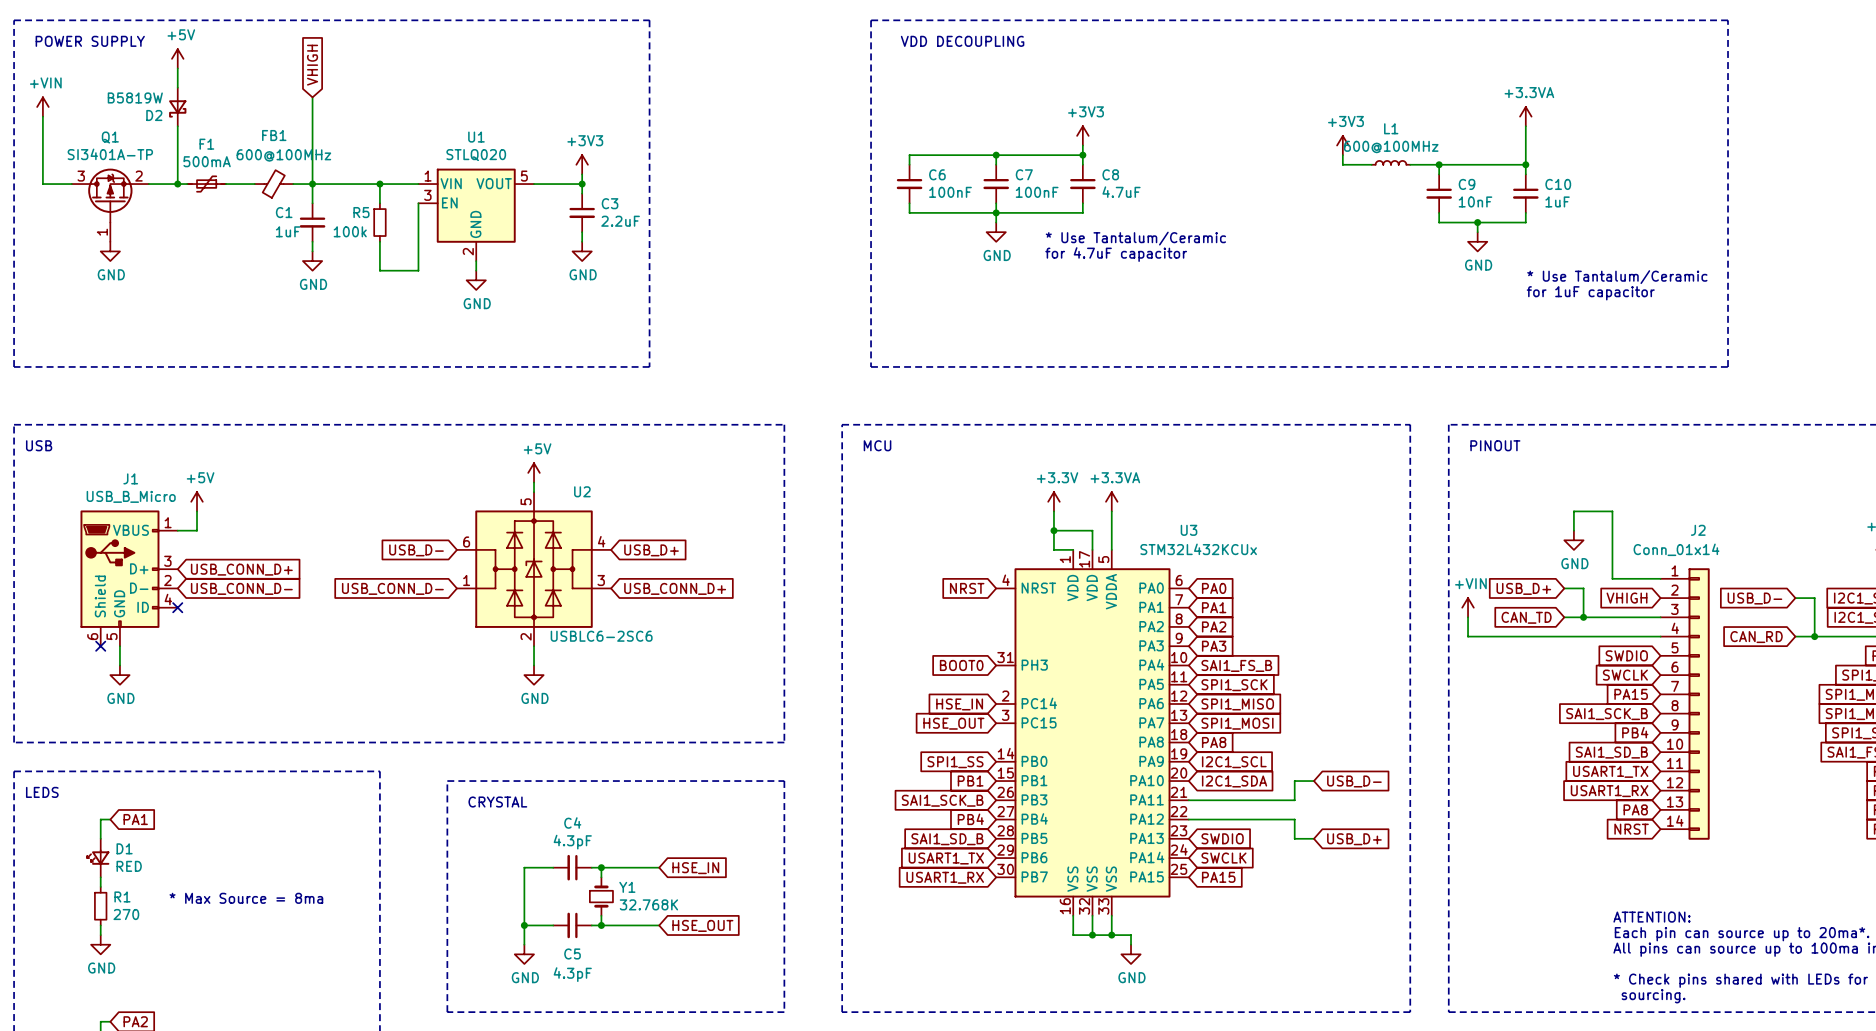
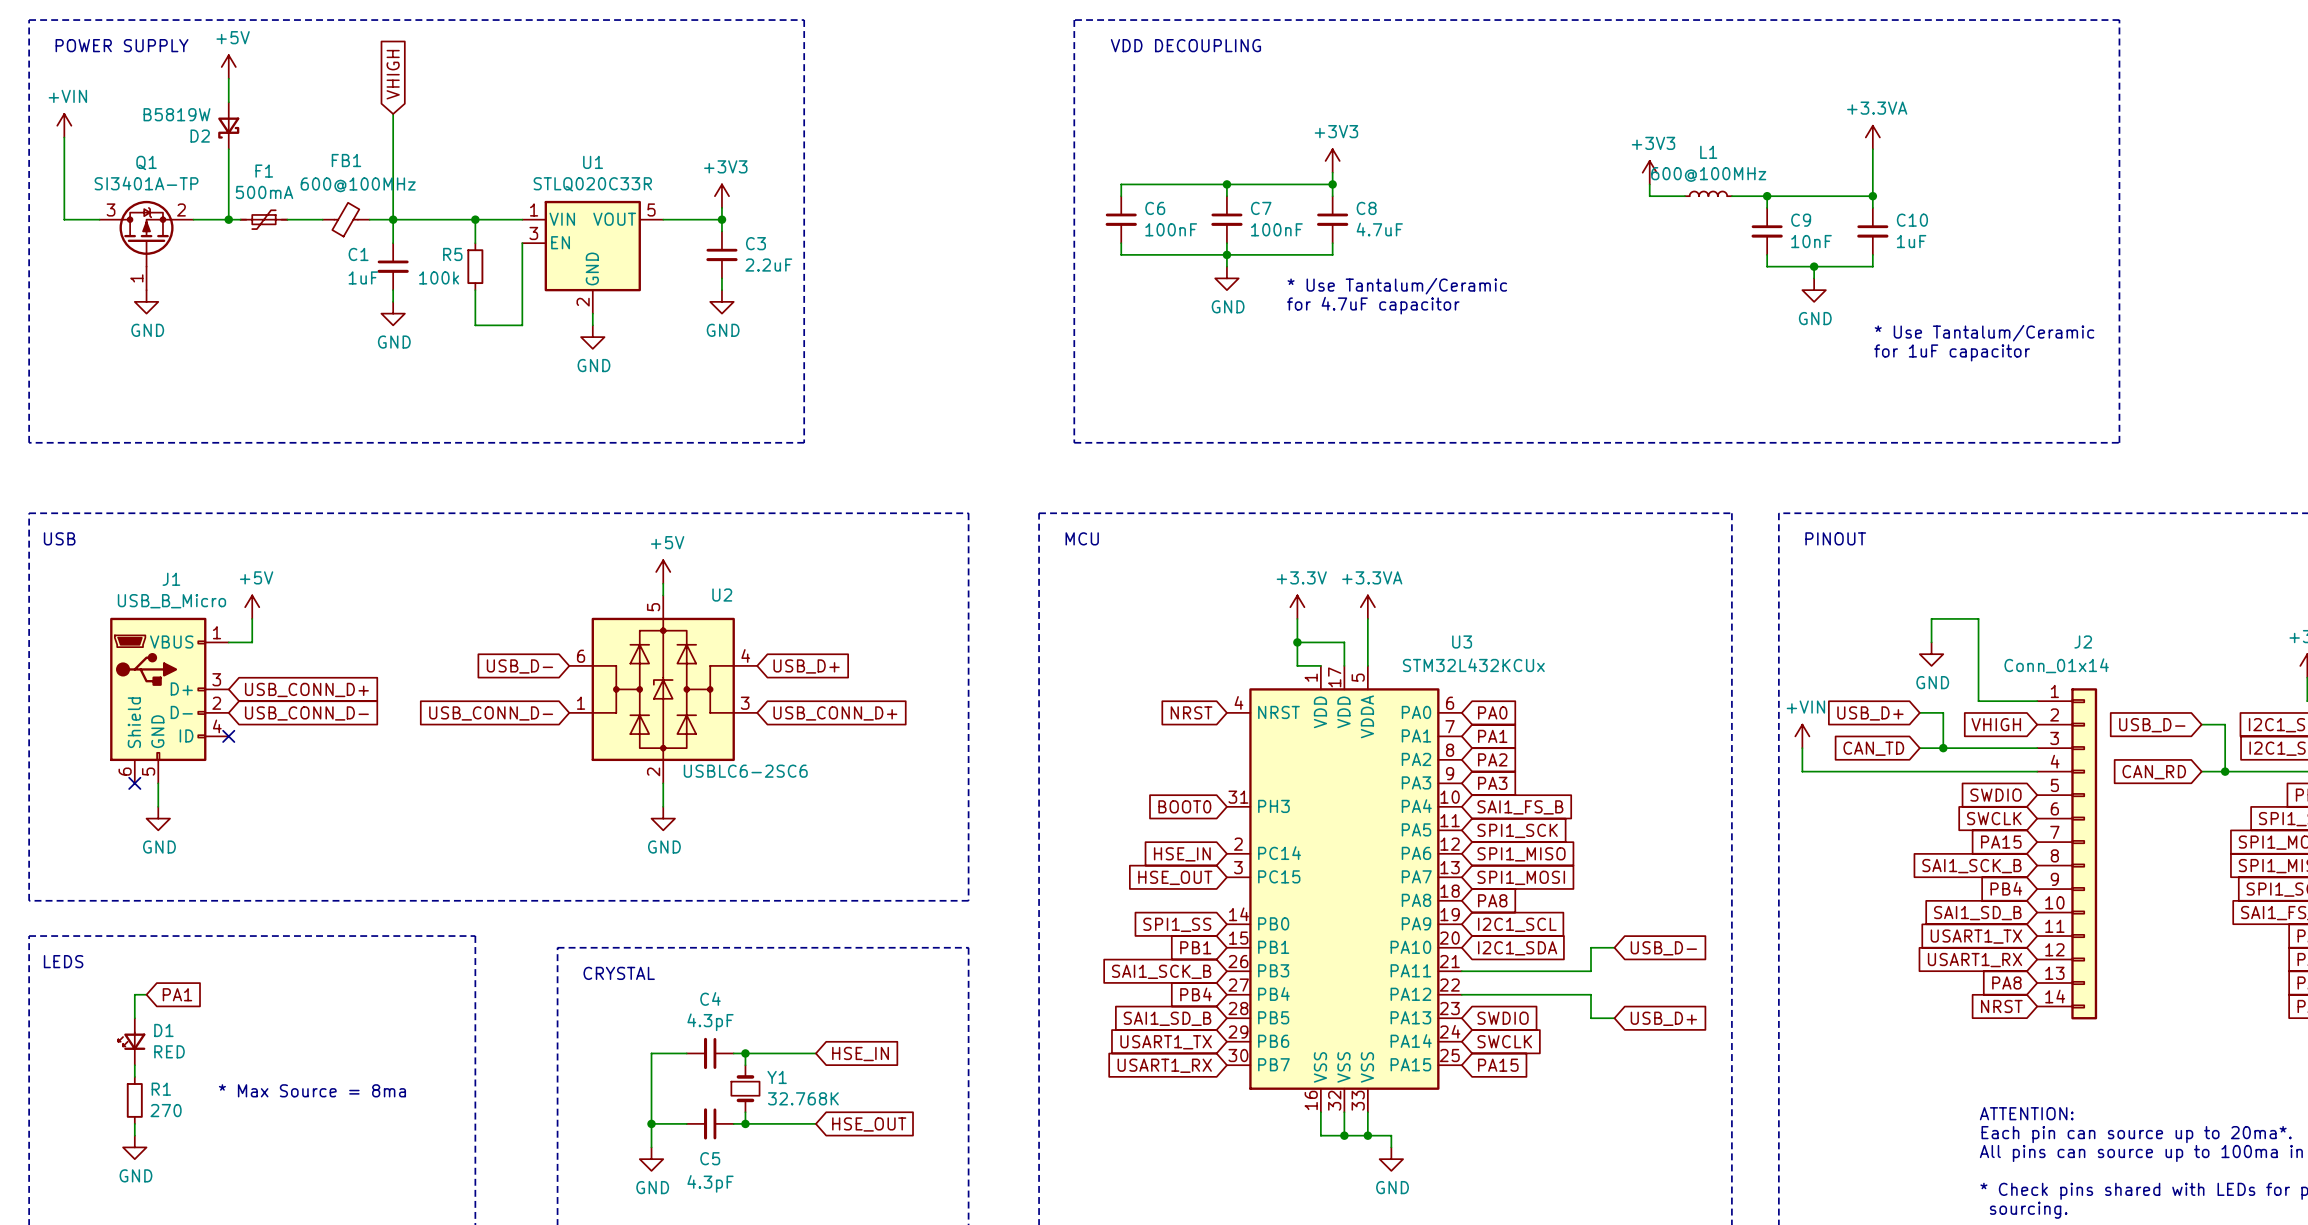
U1 value: STLQ020 (476, 155) -> STLQ020C33R (592, 184)

